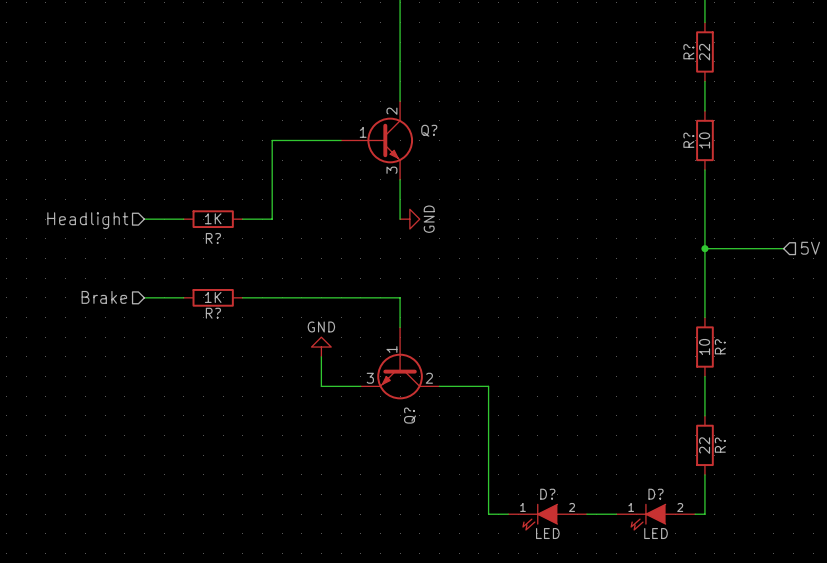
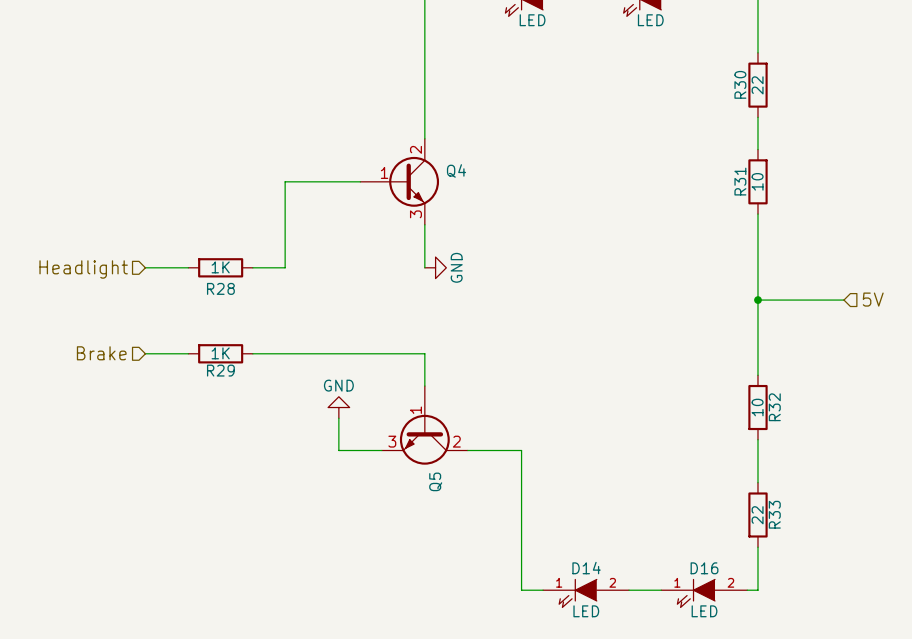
R? name: R? (688, 51) -> R30 (740, 84)
Q? name: Q? (429, 130) -> Q4 (456, 170)
R? name: R? (688, 140) -> R31 (740, 181)
R? name: R? (213, 238) -> R28 (220, 288)
R? name: R? (213, 313) -> R29 (220, 370)
R? name: R? (720, 346) -> R32 (774, 407)
Q? name: Q? (409, 415) -> Q5 (435, 481)
R? name: R? (720, 445) -> R33 (774, 514)
D? name: D? (547, 494) -> D14 (586, 568)
D? name: D? (656, 494) -> D16 (704, 568)

